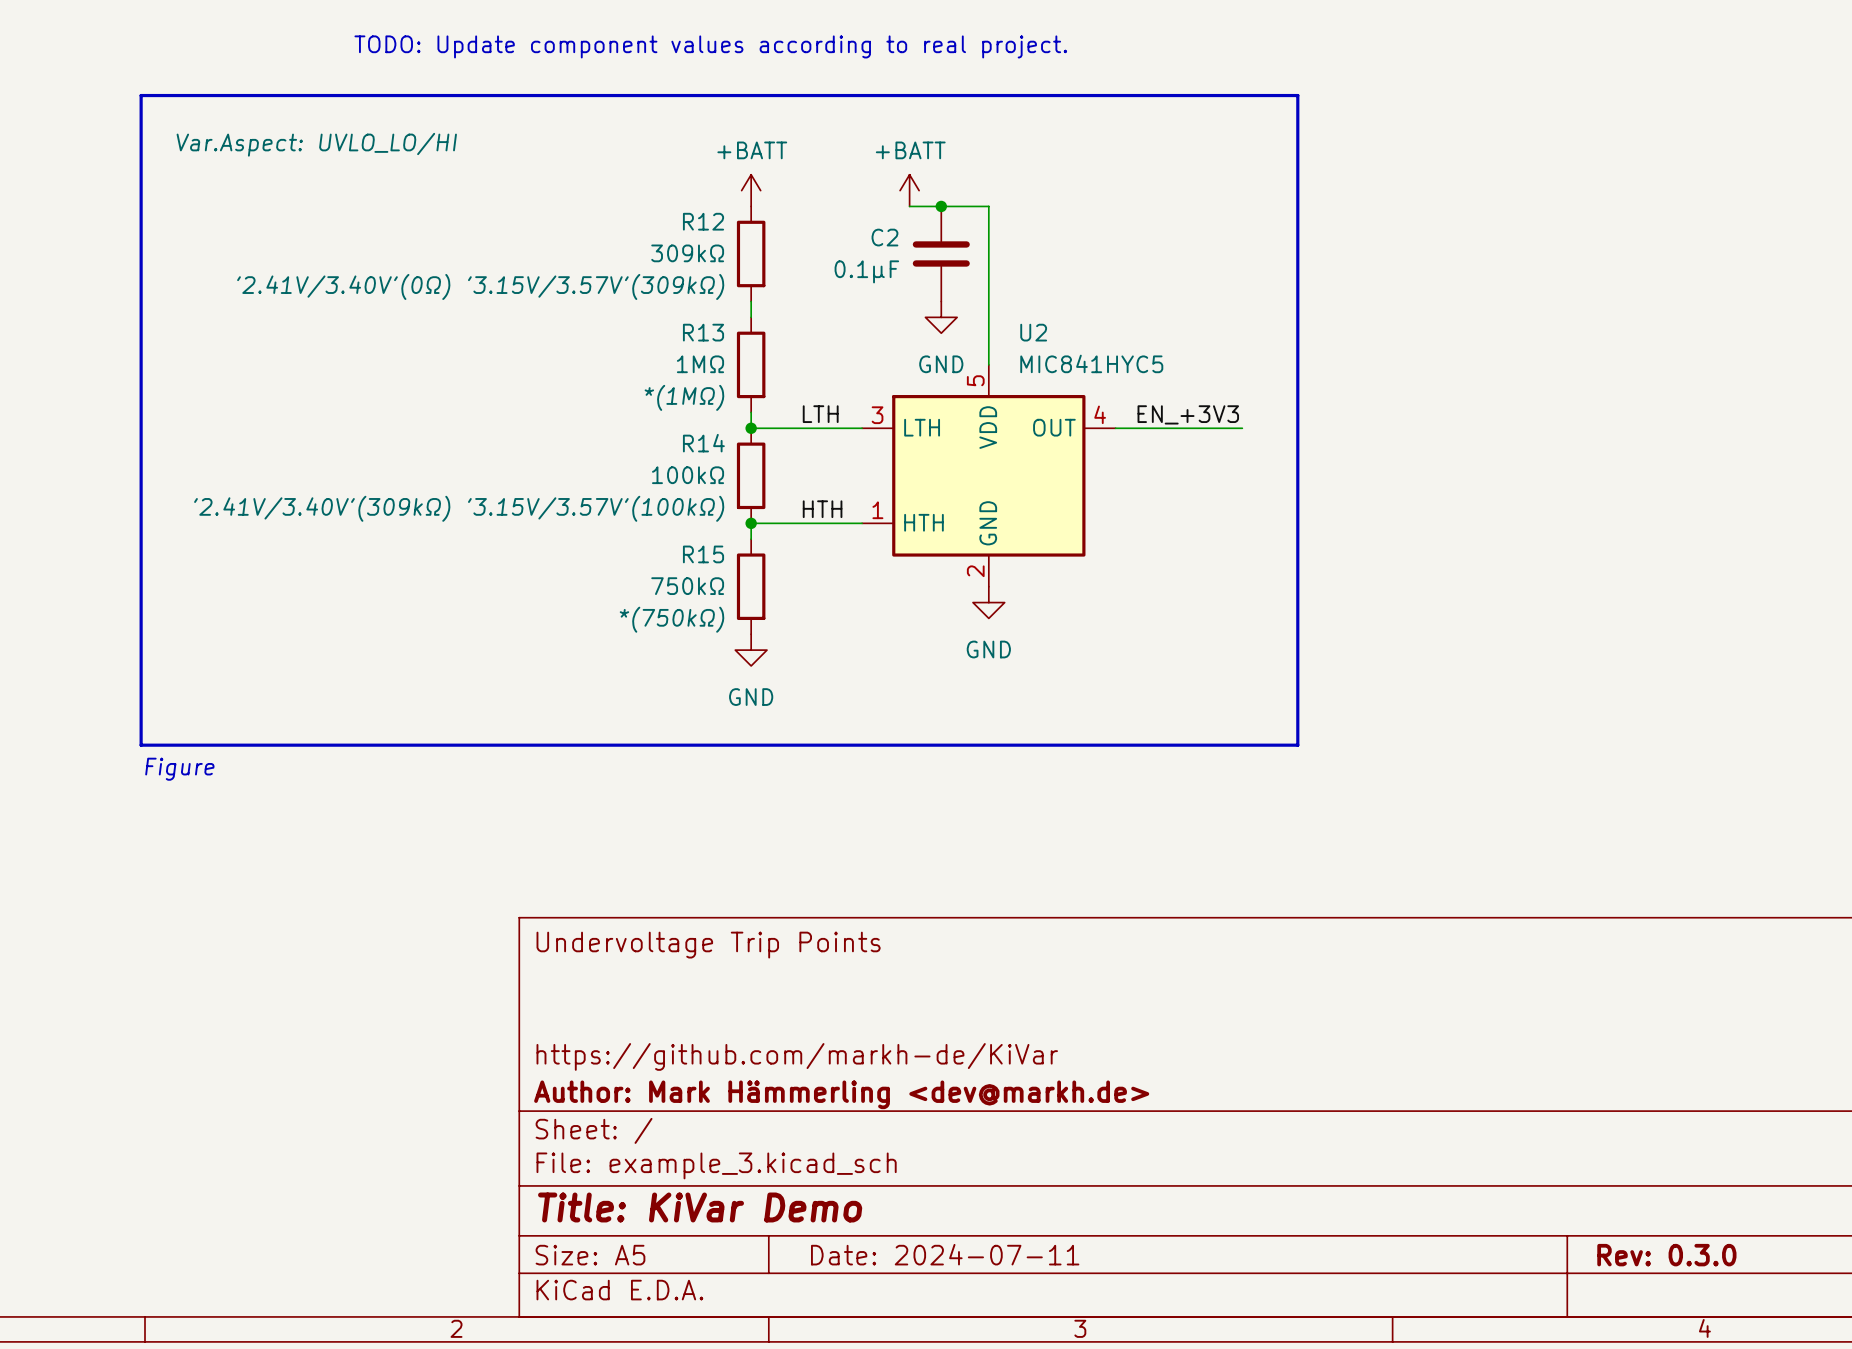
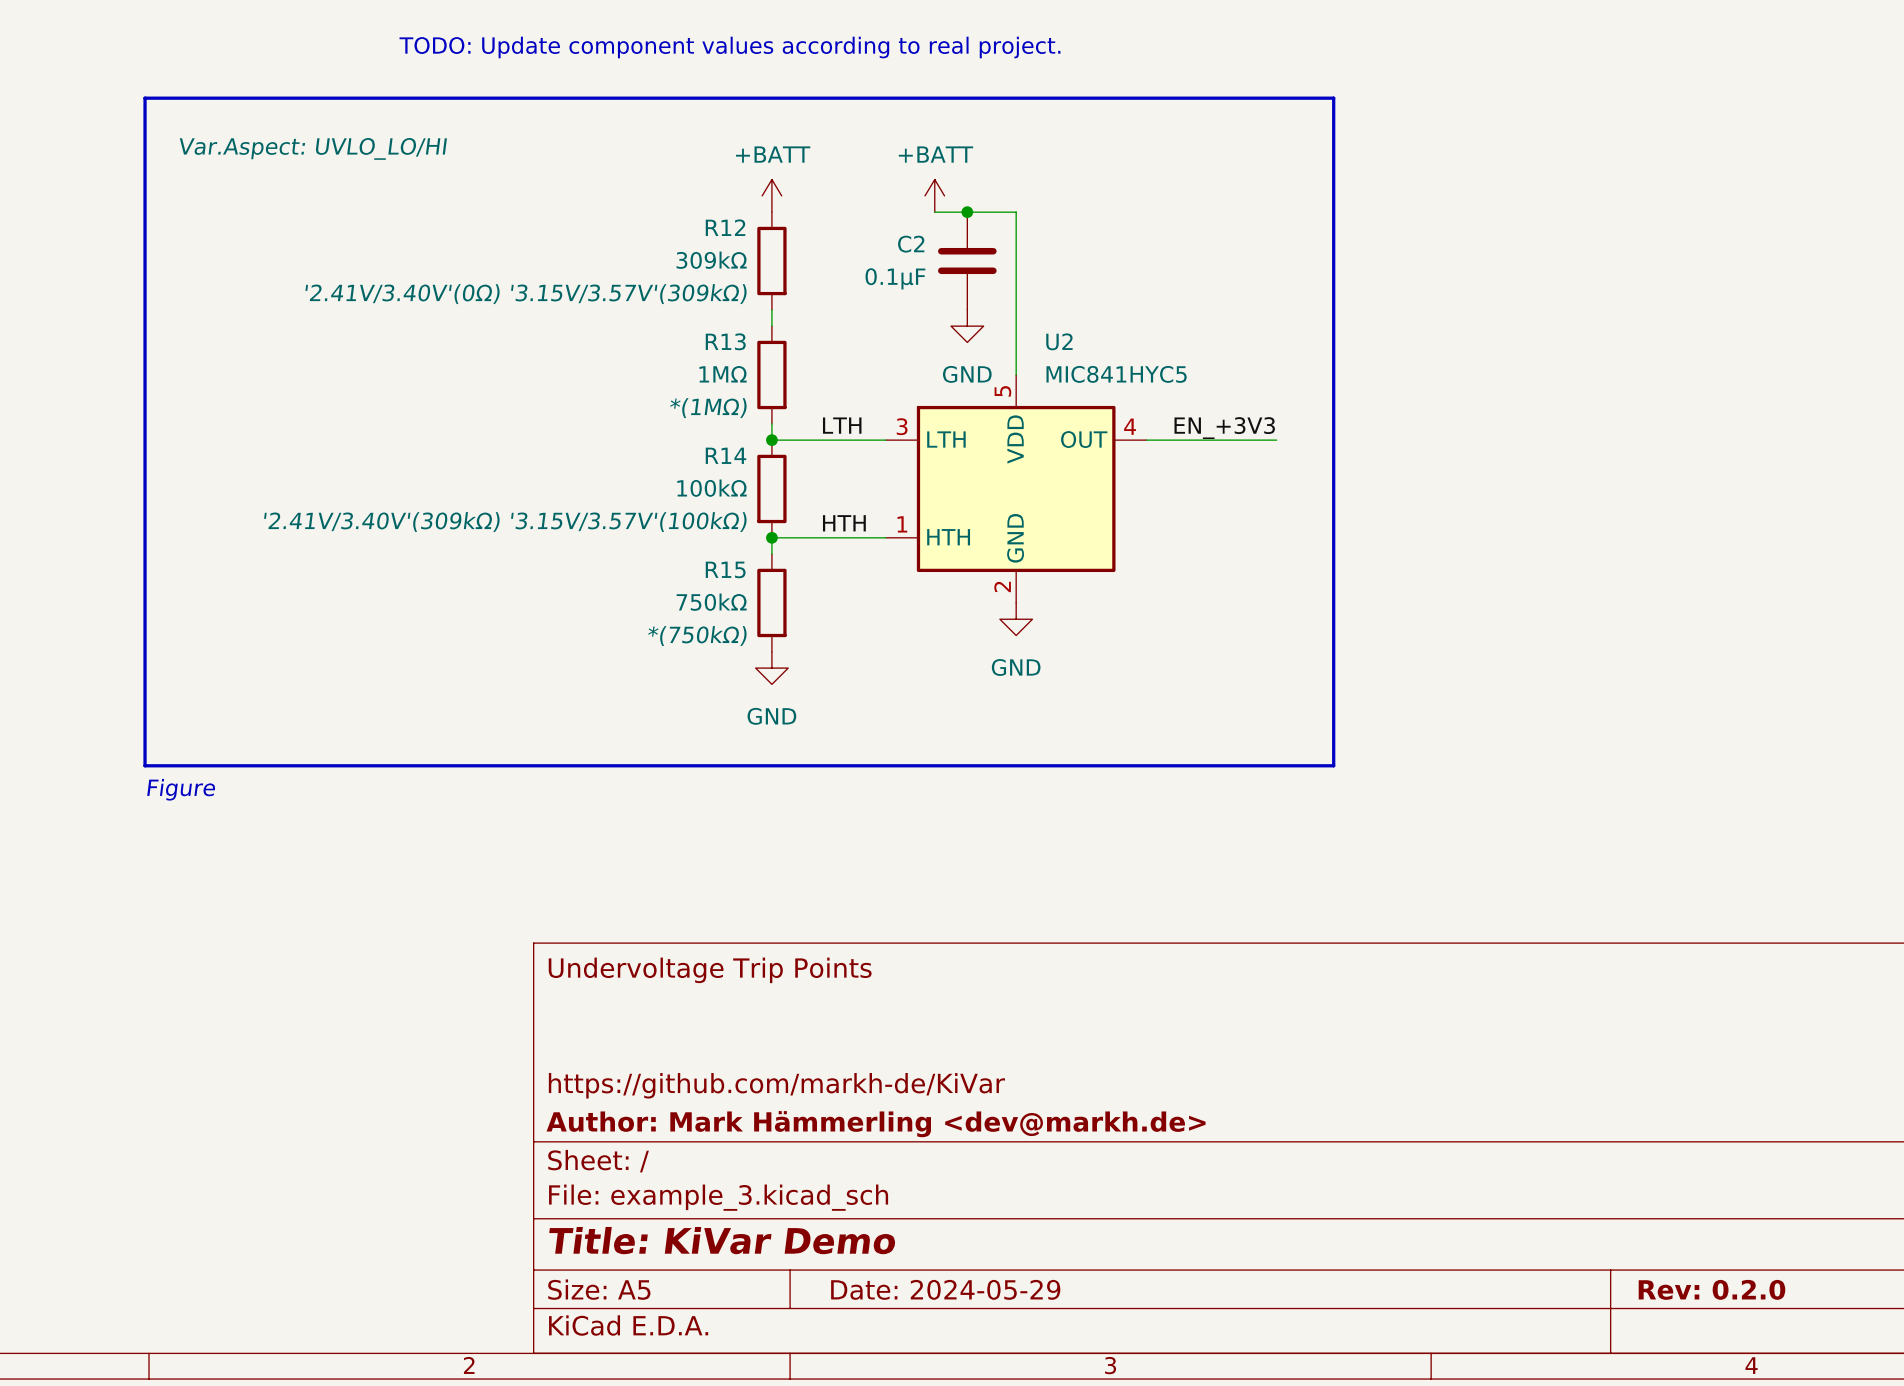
title block: Date: 2024-07-11 (945, 1254) -> Date: 2024-05-29 (945, 1289)
title block: Rev: 0.3.0 (1666, 1255) -> Rev: 0.2.0 (1711, 1289)

